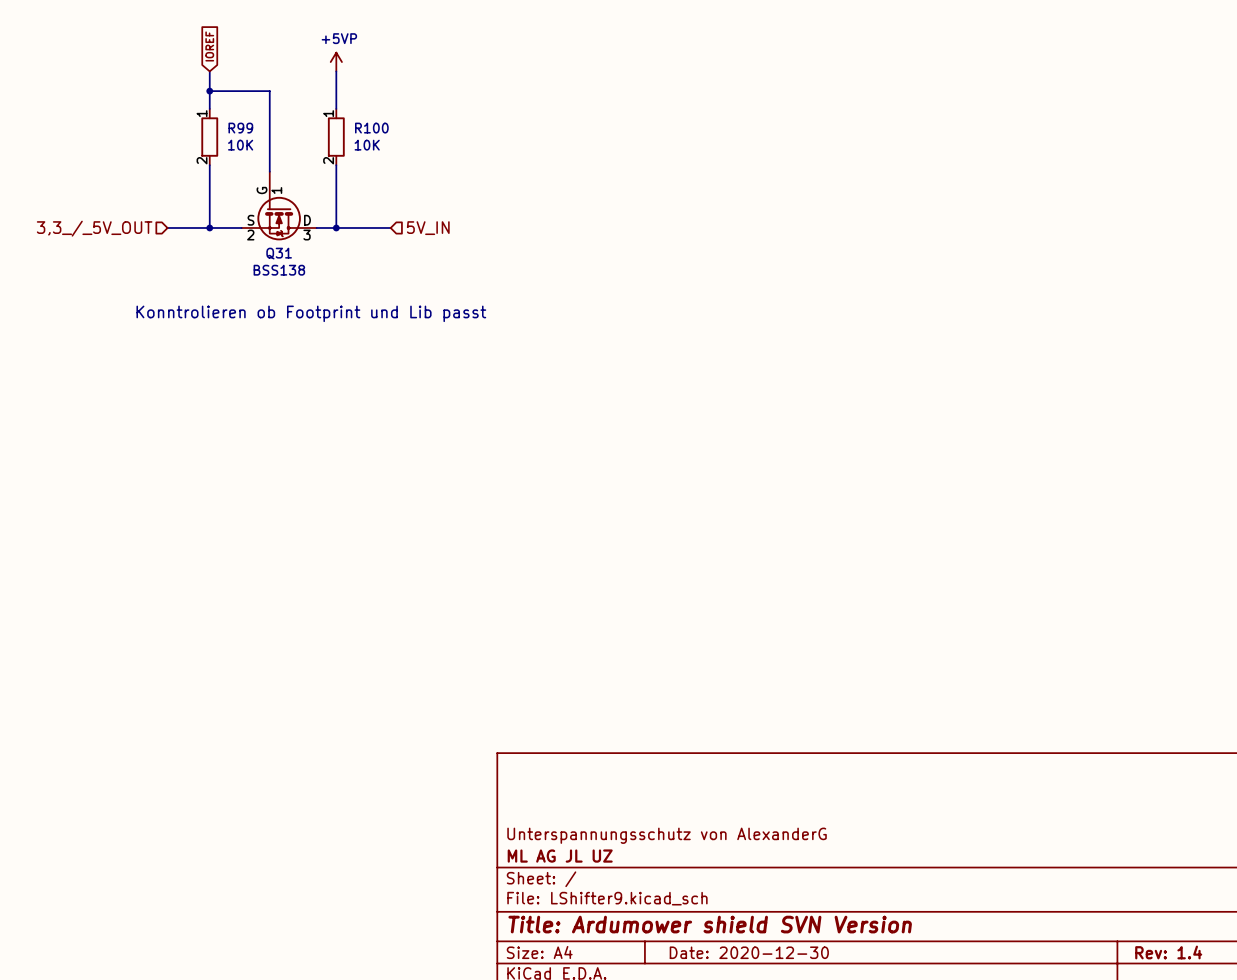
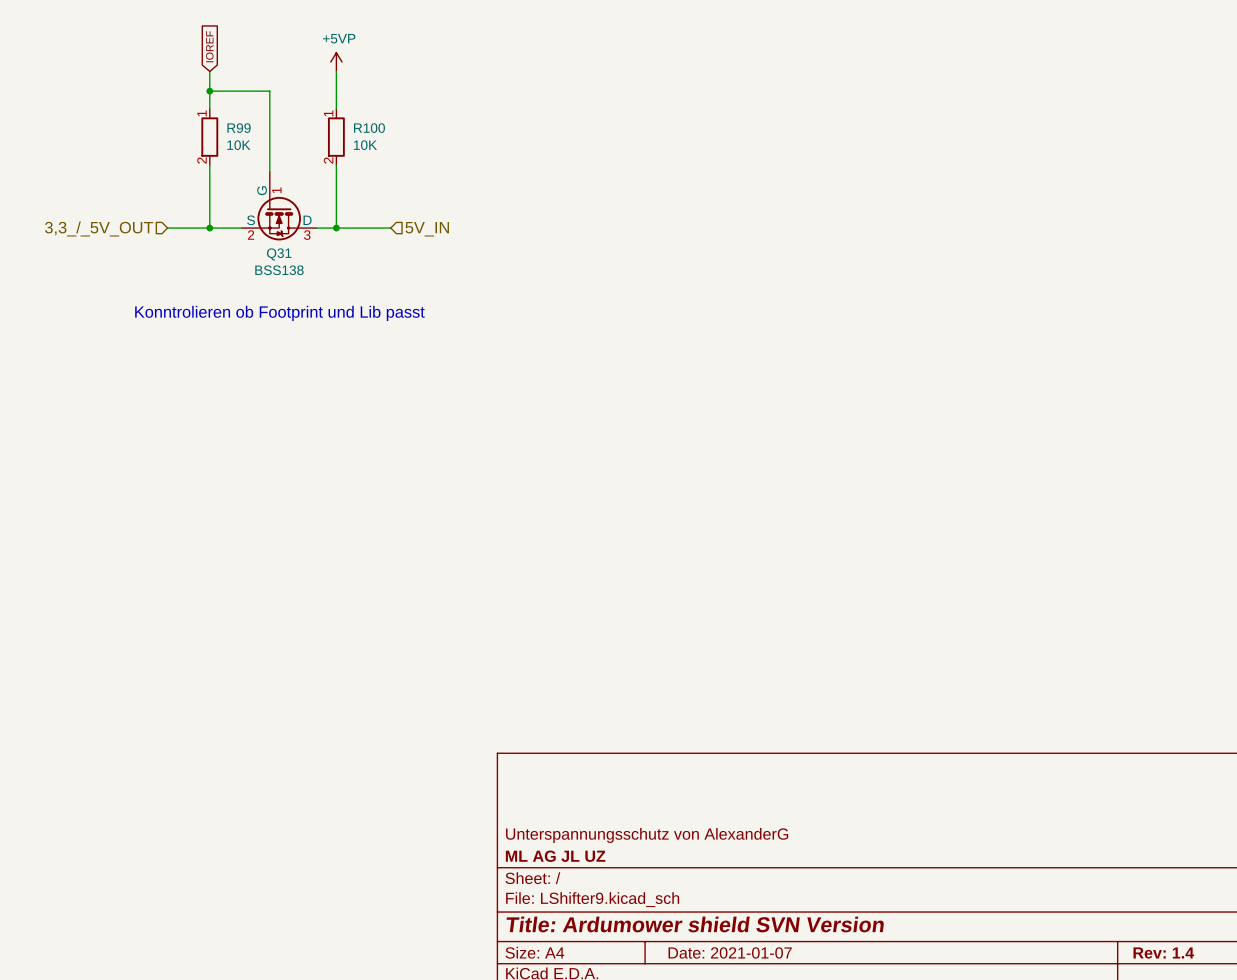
title block: Date: 2020-12-30 (749, 952) -> Date: 2021-01-07 (730, 952)

